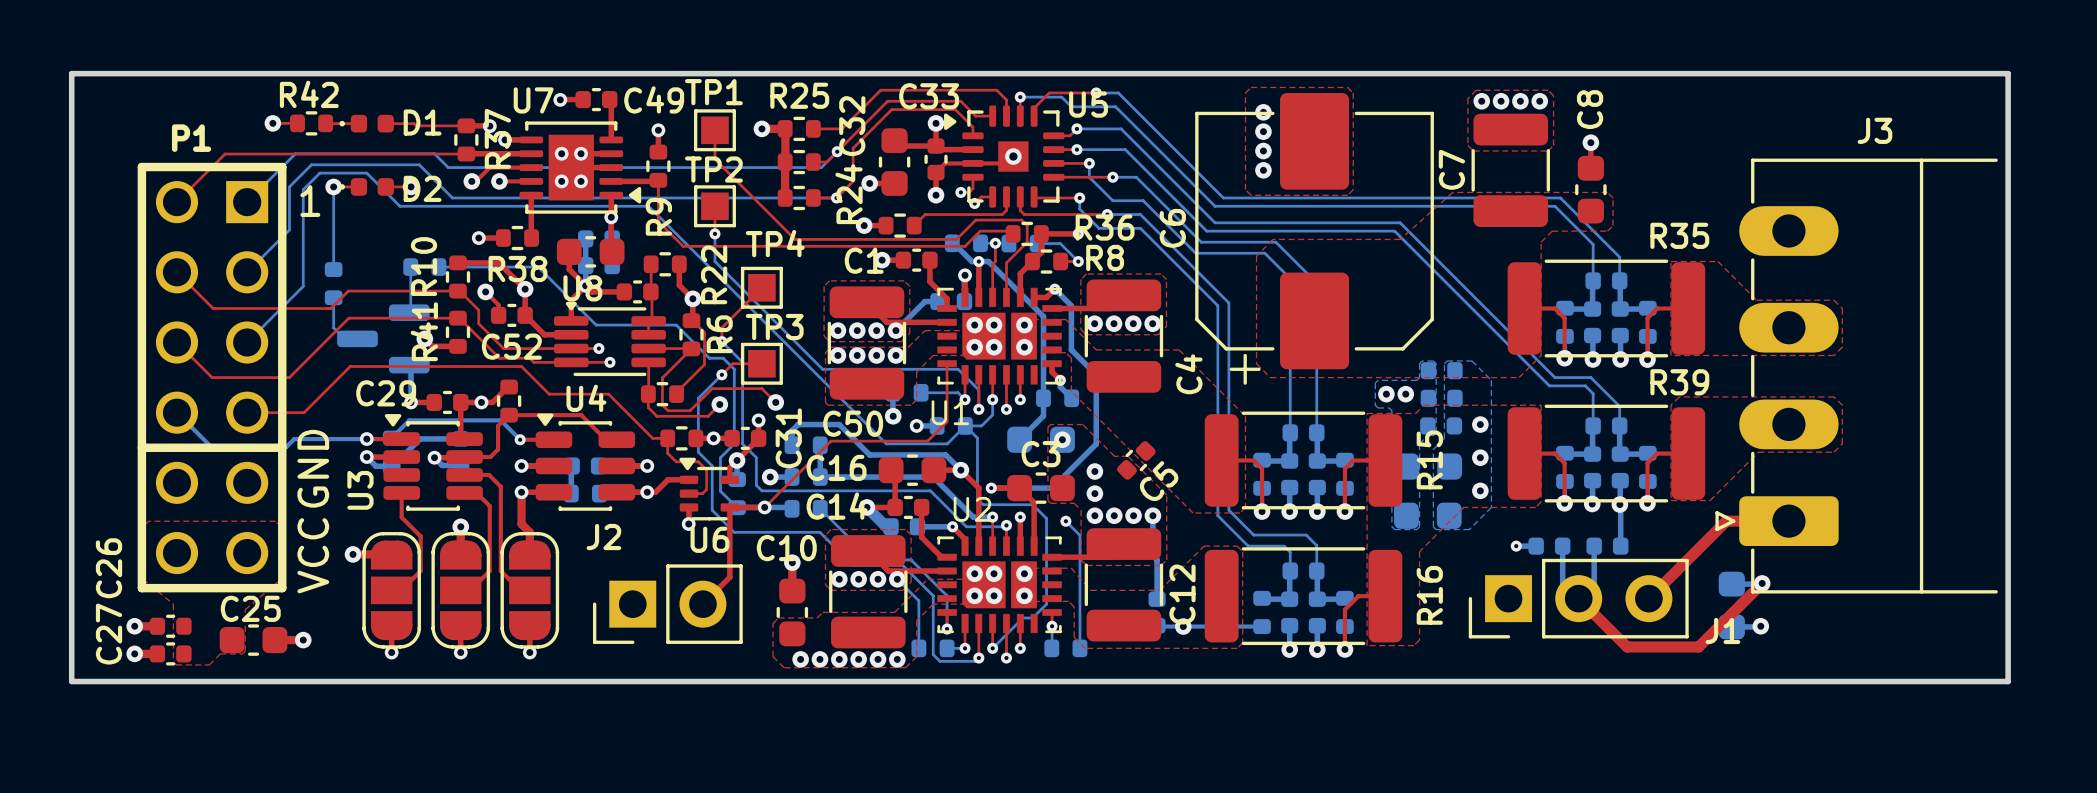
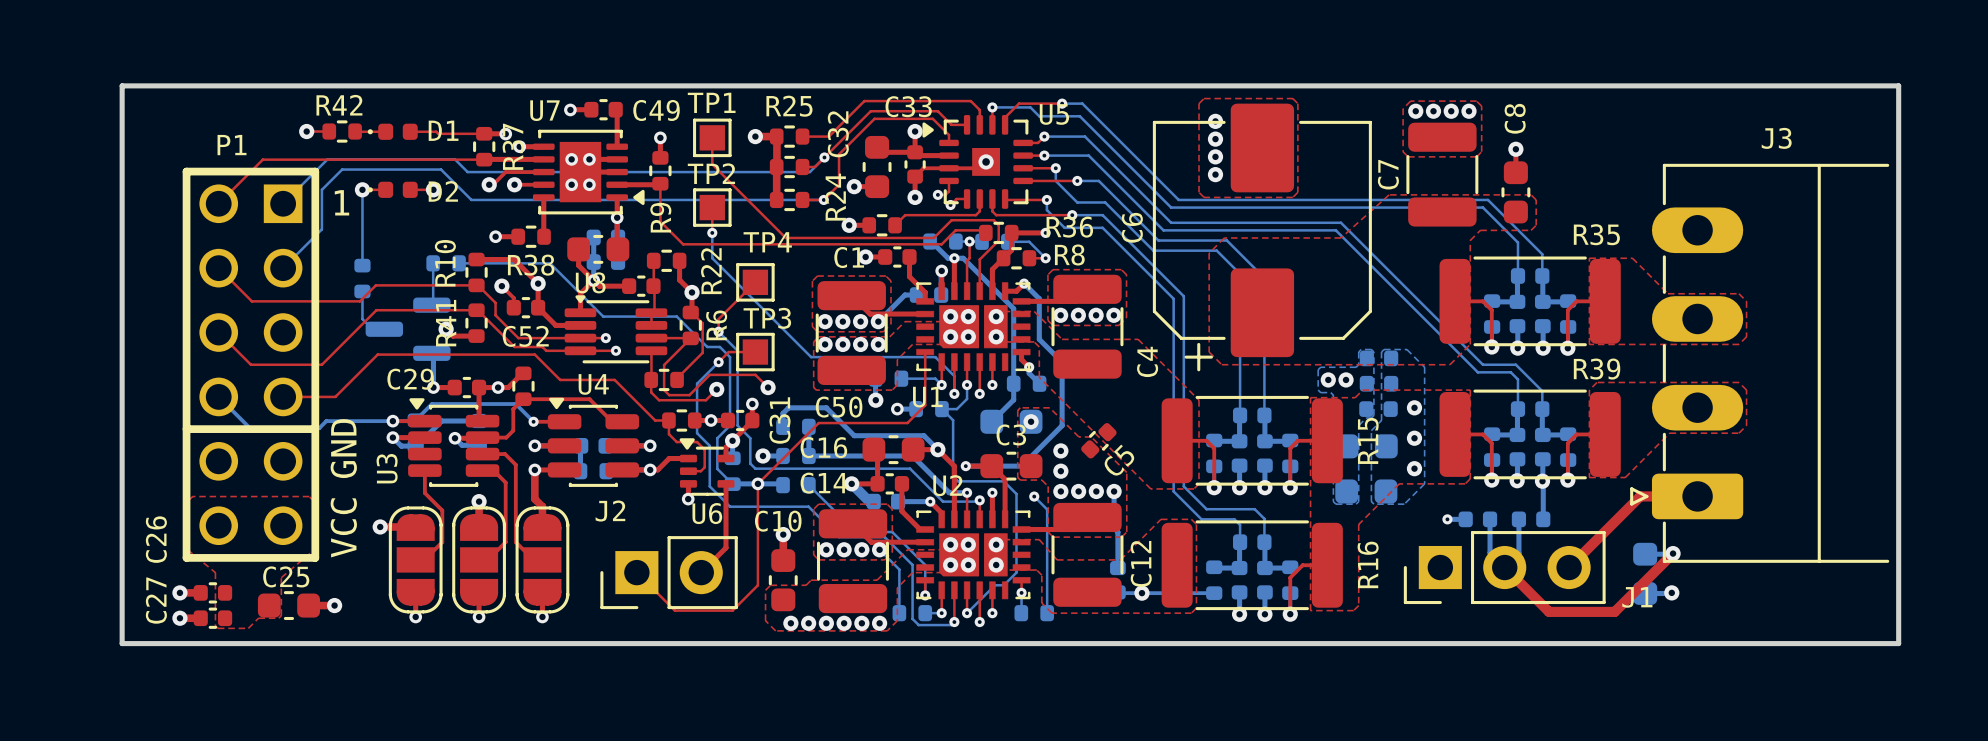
bottom track: (247, 342) (303, 286) (303, 189) (319, 173) (366, 173) (399, 206) (648, 206) (886, 443) (947, 443) (965, 425) -> none
top track: (729, 507) (764, 507) -> (636, 572) (674, 610) (732, 610) (757, 585) (757, 483)

